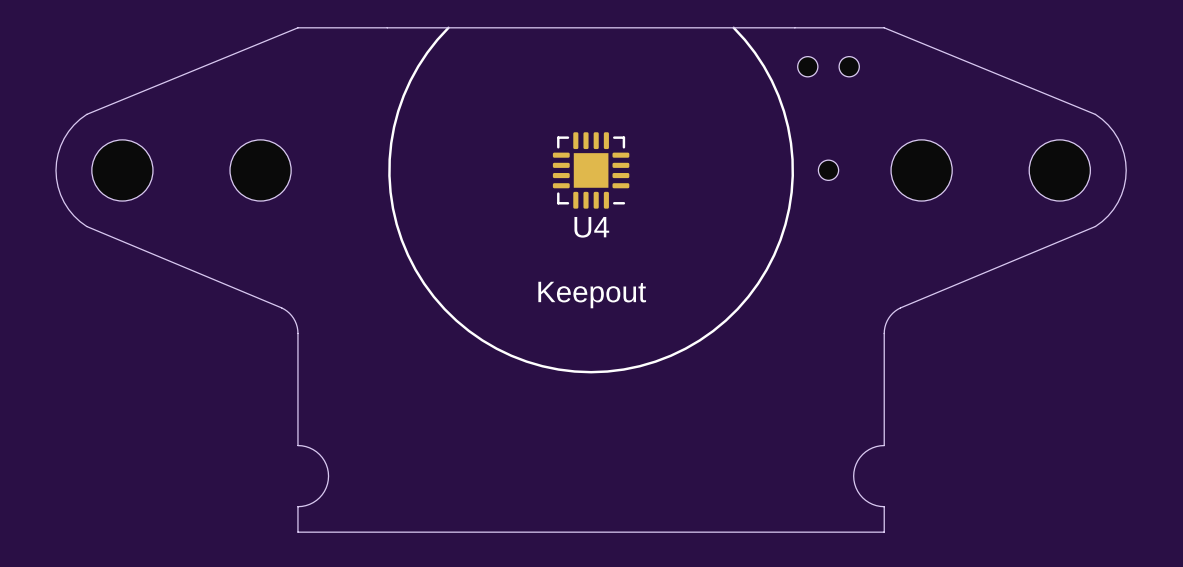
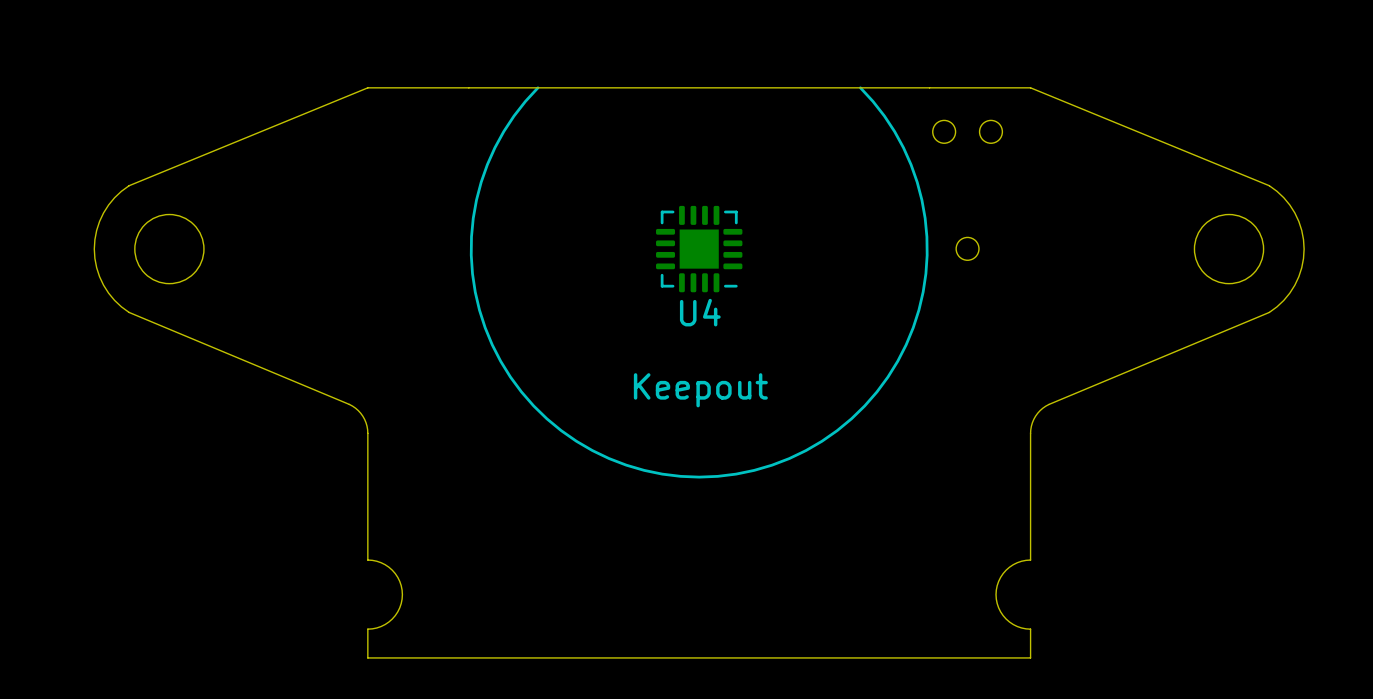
part: (260, 170) -> none
part: (921, 170) -> none

